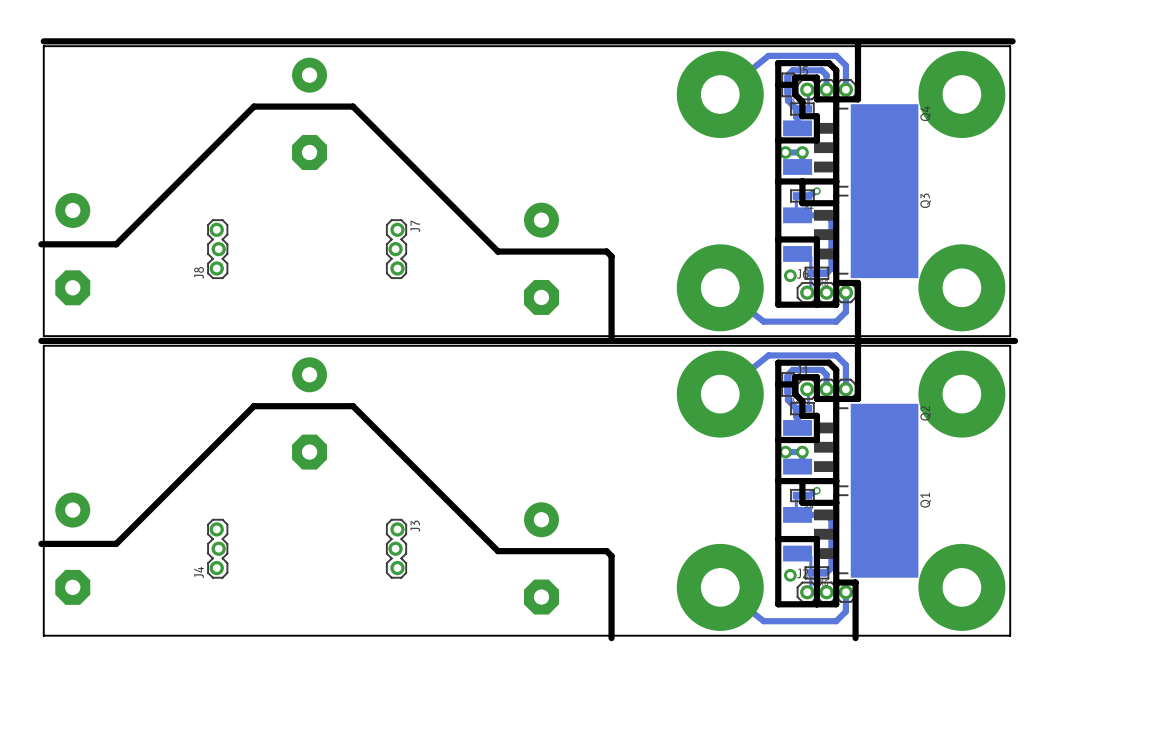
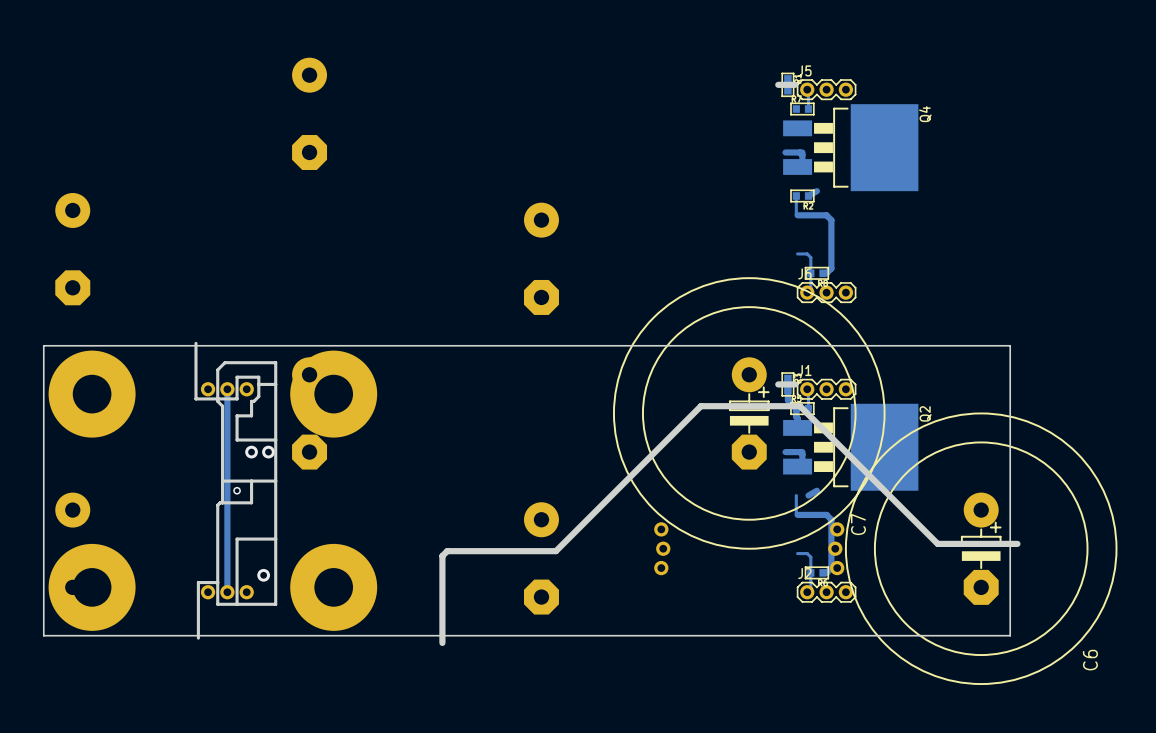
board edge: (1012, 41) (43, 41) -> none
board edge: (857, 43) (857, 99) (816, 99) (816, 77) (795, 77) (795, 94) (802, 101) (802, 116) (816, 116) (816, 140) (778, 140) -> none
board edge: (1010, 46) (1010, 336) (43, 336) (43, 46) (1010, 46) -> none
track: (787, 78) (787, 75) (792, 70) (821, 70) (826, 75) (826, 89) -> none
track: (845, 89) (845, 65) (836, 55) (768, 55) (720, 94) -> none
track: (787, 90) (787, 100) (796, 109) (797, 128) -> none
part: (720, 94) -> none
part: (961, 94) -> none
via: (785, 152) -> none
via: (802, 152) -> none
board edge: (802, 181) (802, 203) (836, 203) (836, 70) (829, 63) (778, 63) (778, 304) (836, 304) (836, 205) -> none
board edge: (836, 181) (778, 181) -> none
via: (816, 191) -> none
Q3: (850, 234) -> none
board edge: (778, 239) (816, 239) (816, 304) -> none
board edge: (41, 244) (116, 244) (253, 106) (353, 106) (497, 251) (606, 251) (611, 256) (611, 338) -> none
J8: (217, 249) -> none
J7: (396, 249) -> none
via: (790, 275) -> none
board edge: (836, 282) (857, 282) (857, 338) -> none
track: (720, 287) (763, 321) (836, 321) (845, 311) (845, 292) -> none
part: (720, 287) -> none
part: (961, 287) -> none
board edge: (1015, 340) (41, 340) -> none
board edge: none -> (195, 343) (195, 398) (237, 398) (237, 377) (258, 377) (258, 396) (251, 401) (251, 415) (237, 415) (237, 440) (275, 440)
board edge: (857, 343) (857, 398) (816, 398) (816, 377) (795, 377) (795, 394) (802, 401) (802, 415) (816, 415) (816, 440) (778, 440) -> none
board edge: (829, 362) (836, 369) (836, 604) (778, 604) (778, 362) (829, 362) -> none
track: (787, 378) (787, 374) (792, 369) (821, 369) (826, 374) (826, 389) -> none
board edge: none -> (275, 384) (258, 384)
track: none -> (227, 389) (227, 592)
part: none -> (227, 389)
track: (845, 389) (845, 365) (836, 355) (768, 355) (720, 394) -> none
part: none -> (92, 394)
part: none -> (333, 394)
part: (720, 394) -> none
part: (961, 394) -> none
C7: none -> (749, 413)
via: none -> (251, 452)
via: none -> (268, 452)
via: (785, 452) -> none
via: (802, 452) -> none
board edge: none -> (251, 481) (251, 502) (220, 502) (217, 505) (217, 604) (275, 604) (275, 362) (224, 362) (217, 369) (217, 401) (222, 406) (222, 502)
board edge: none -> (275, 481) (222, 481)
board edge: (802, 481) (802, 502) (836, 502) -> none
board edge: (836, 481) (778, 481) -> none
via: none -> (237, 490)
via: (816, 490) -> none
part: (802, 495) -> none
Q1: (850, 534) -> none
board edge: none -> (275, 539) (237, 539) (237, 604)
board edge: (778, 539) (816, 539) (816, 604) -> none
board edge: (41, 543) (116, 543) (253, 406) (353, 406) (497, 551) -> (442, 642) (442, 555) (447, 551) (497, 551)
J4: (217, 548) -> none
J3: (396, 548) -> none
part: none -> (662, 548)
part: none -> (836, 548)
C6: none -> (981, 548)
board edge: (555, 551) (606, 551) (611, 555) (611, 638) -> (555, 551) (700, 406) (800, 406) (937, 543) (1017, 543)
via: none -> (263, 575)
via: (790, 575) -> none
board edge: none -> (217, 582) (198, 582) (198, 638)
board edge: (836, 582) (855, 582) (855, 638) -> none
part: none -> (92, 587)
part: none -> (333, 587)
track: (720, 587) (763, 621) (836, 621) (845, 611) (845, 592) -> none
part: (720, 587) -> none
part: (961, 587) -> none
part: none -> (227, 592)

